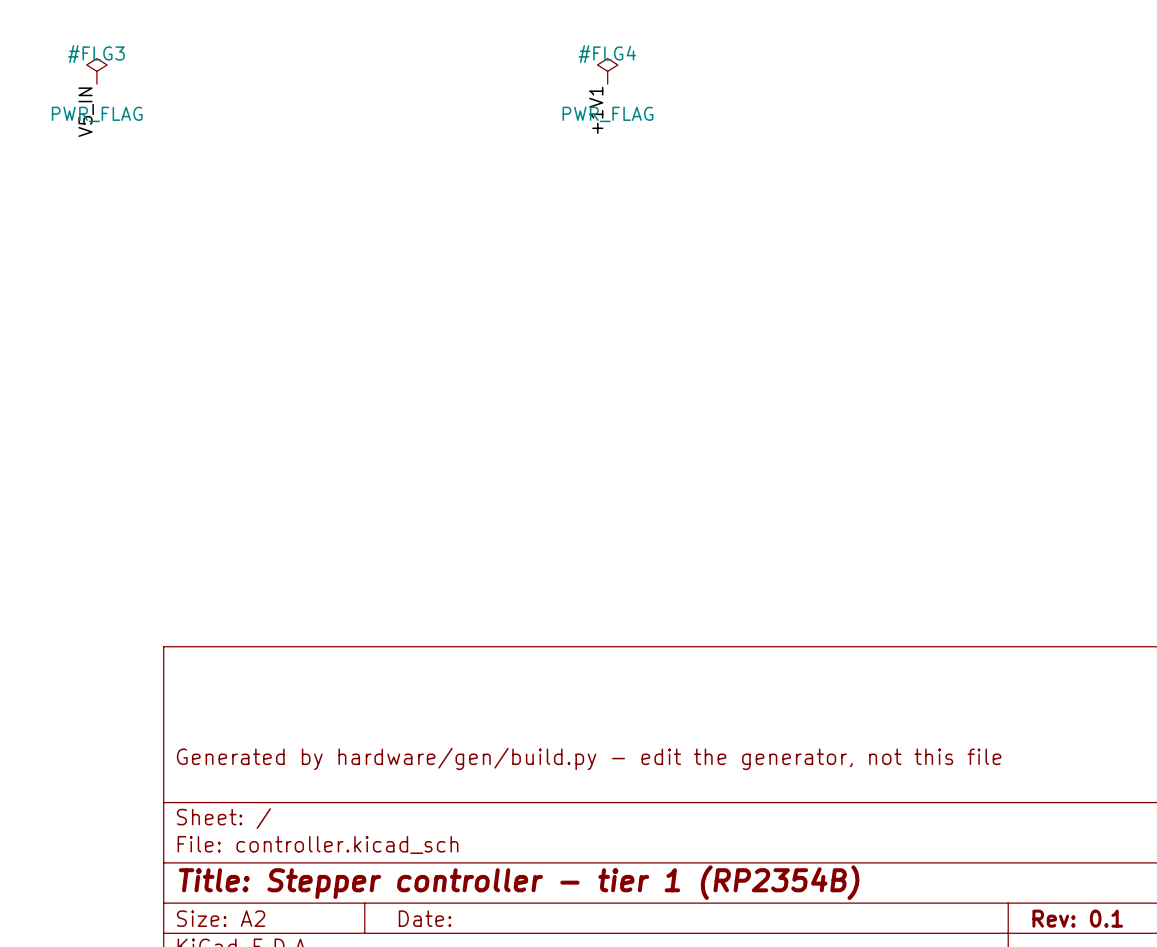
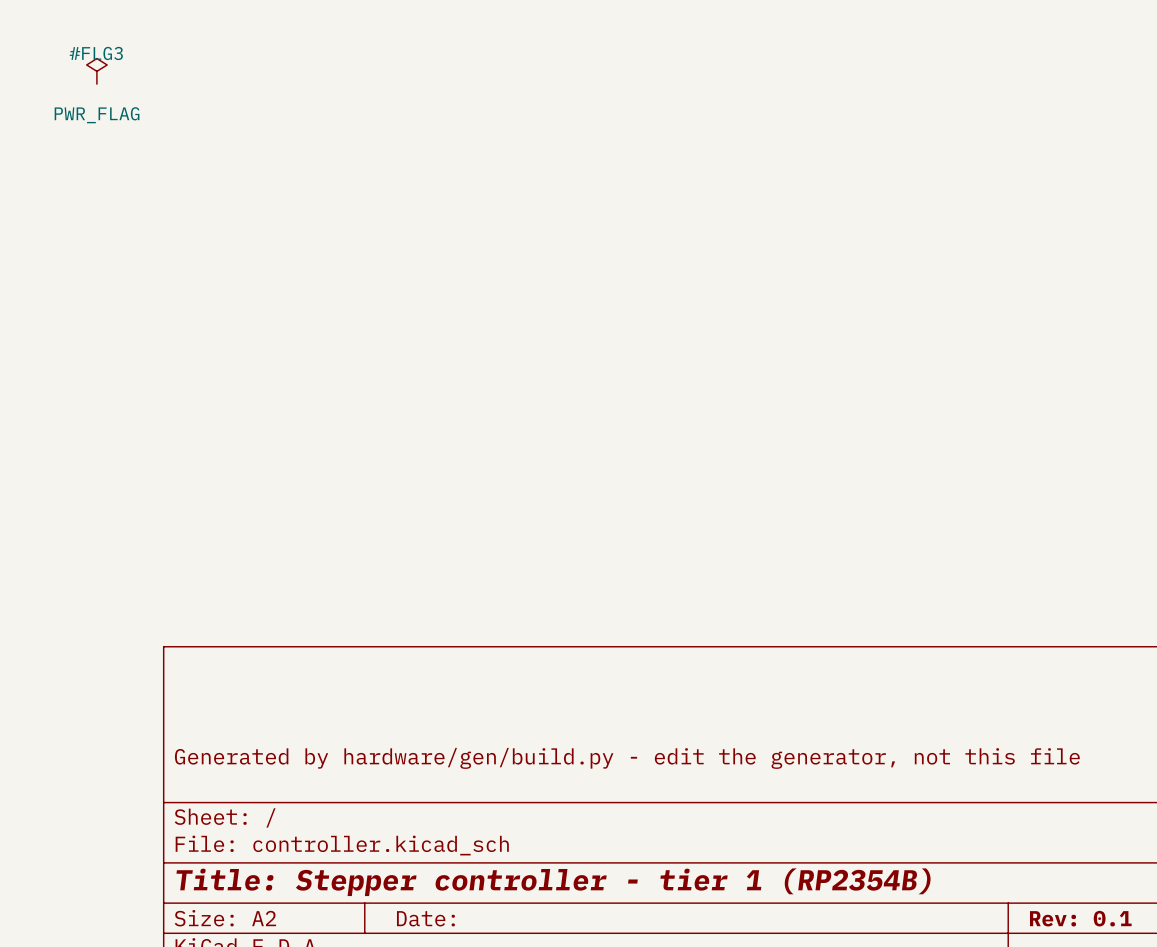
#FLG4: PWR_FLAG (607, 71) -> none
label: +1V1 (596, 110) -> none
label: V5_IN (86, 112) -> none

